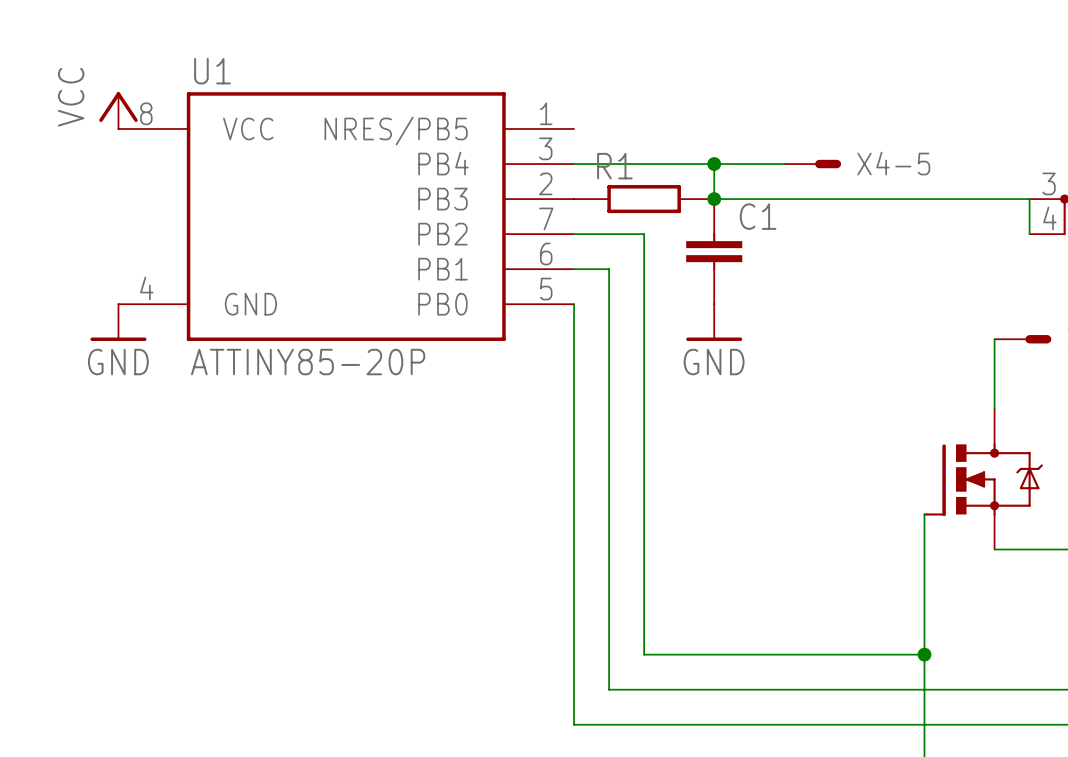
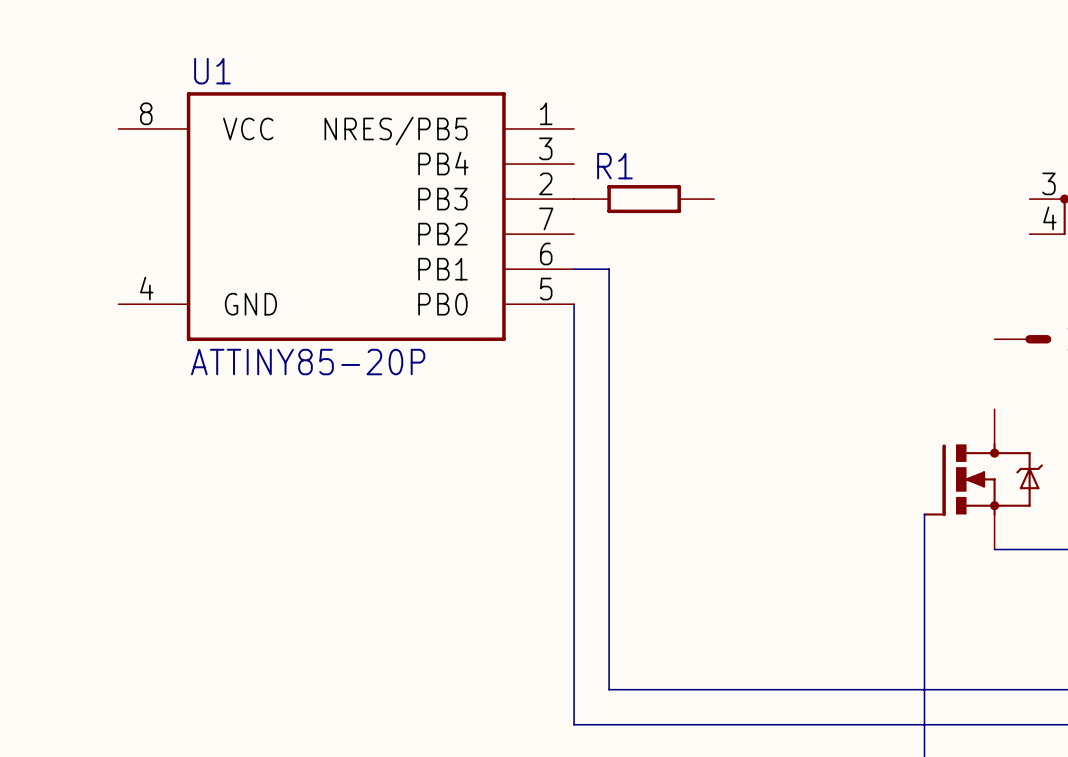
power symbol: VCC (118, 110) -> none
wire: (574, 164) (784, 164) -> none
wire: (714, 164) (714, 199) (1029, 199) (1029, 234) -> none
junction: (714, 164) -> none
X4-5: (812, 164) -> none
junction: (714, 199) -> none
wire: (574, 234) (644, 234) (644, 654) (924, 654) -> none
C1: (714, 251) -> none
power symbol: GND (118, 322) -> none
power symbol: GND (714, 322) -> none
wire: (994, 339) (994, 409) -> none
junction: (924, 654) -> none

